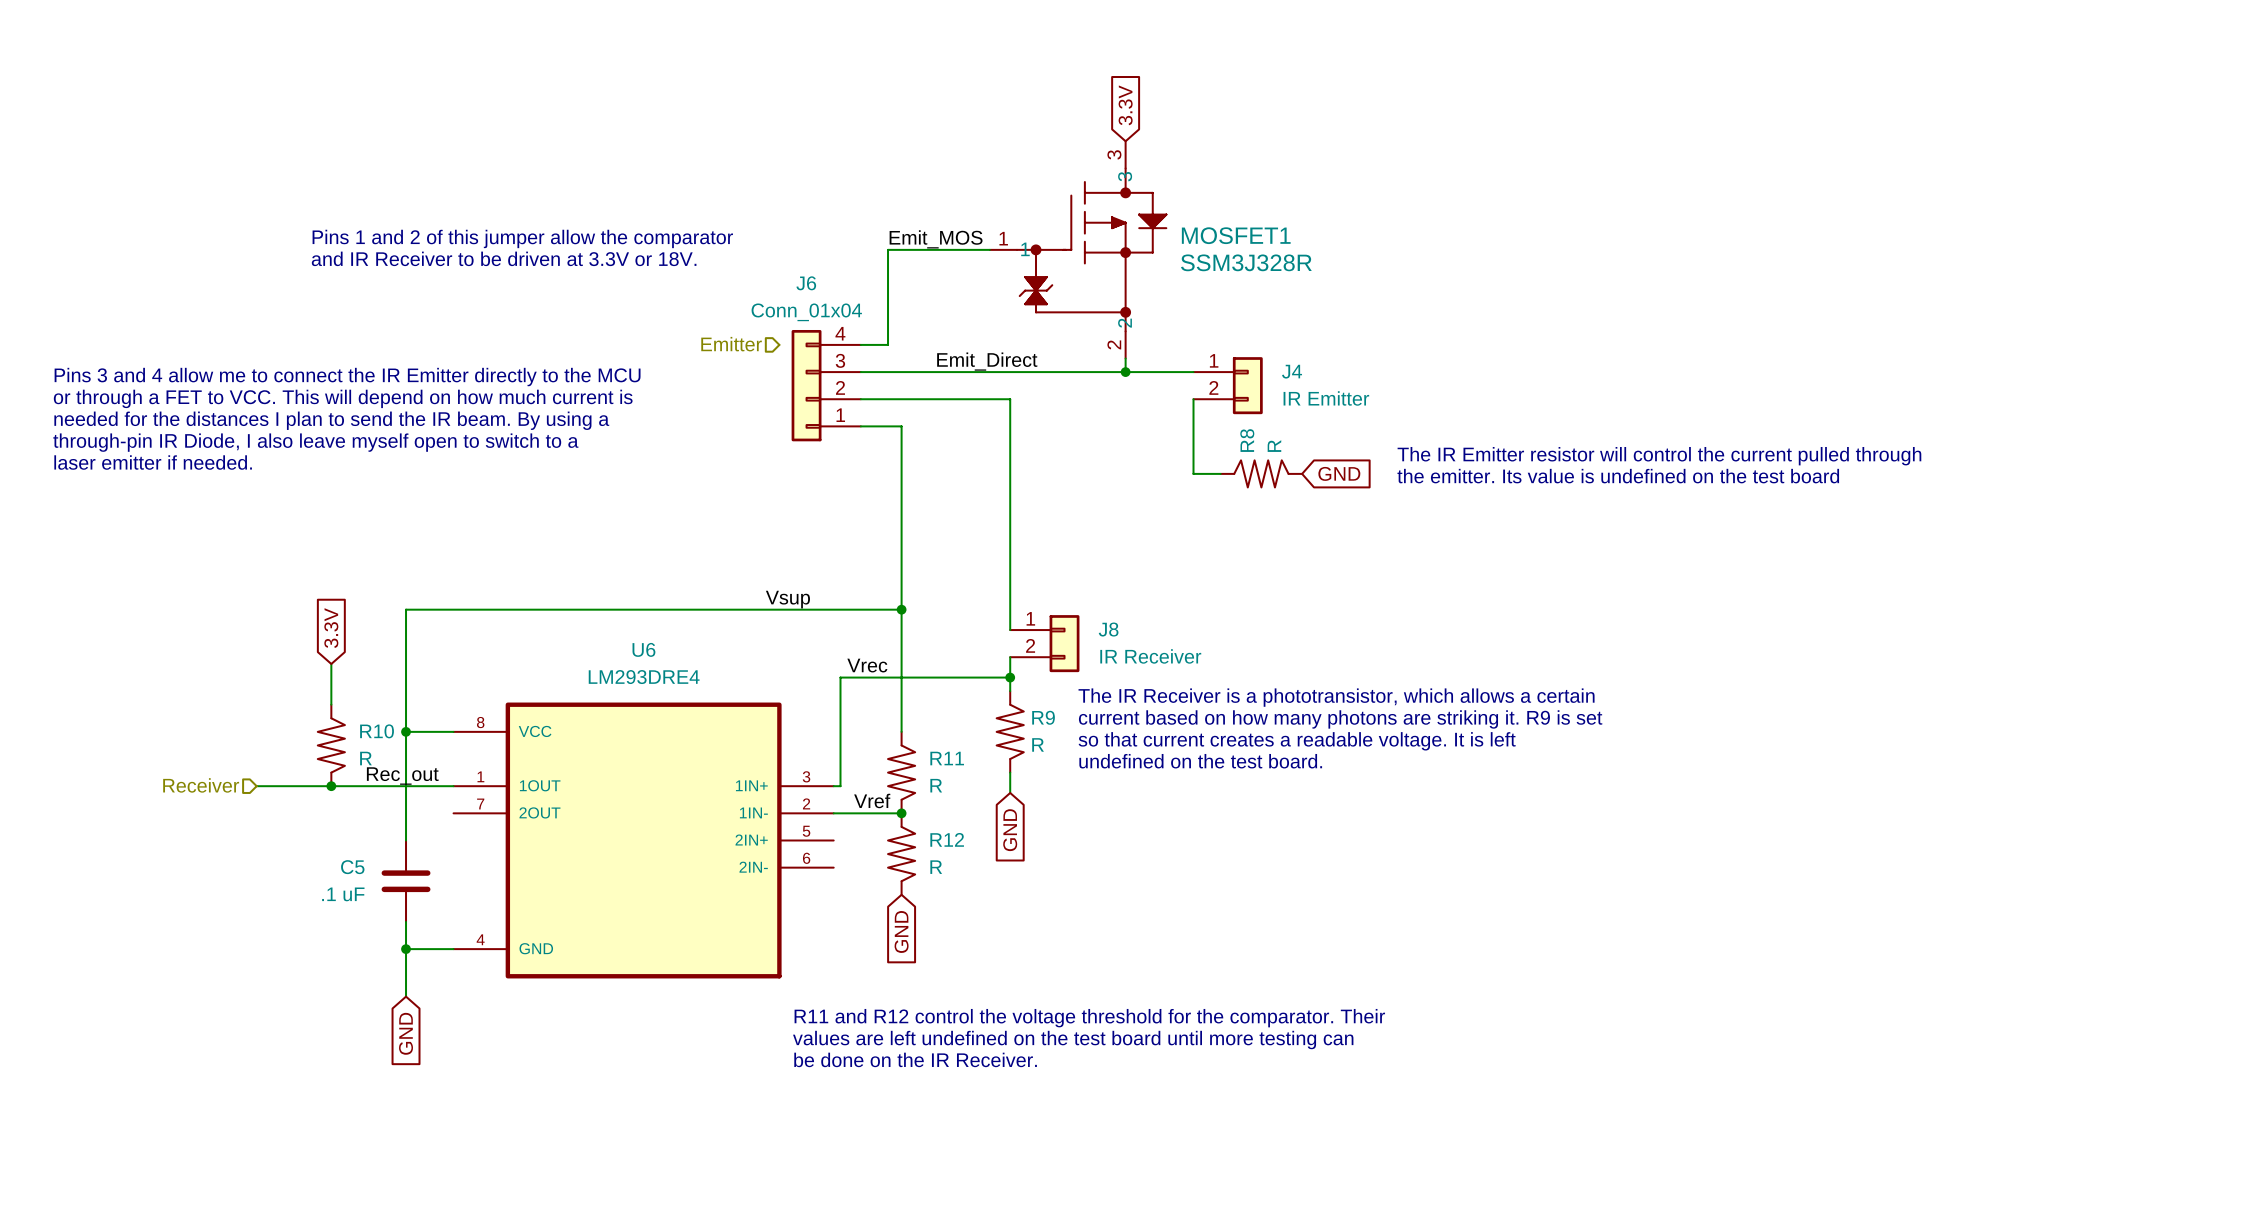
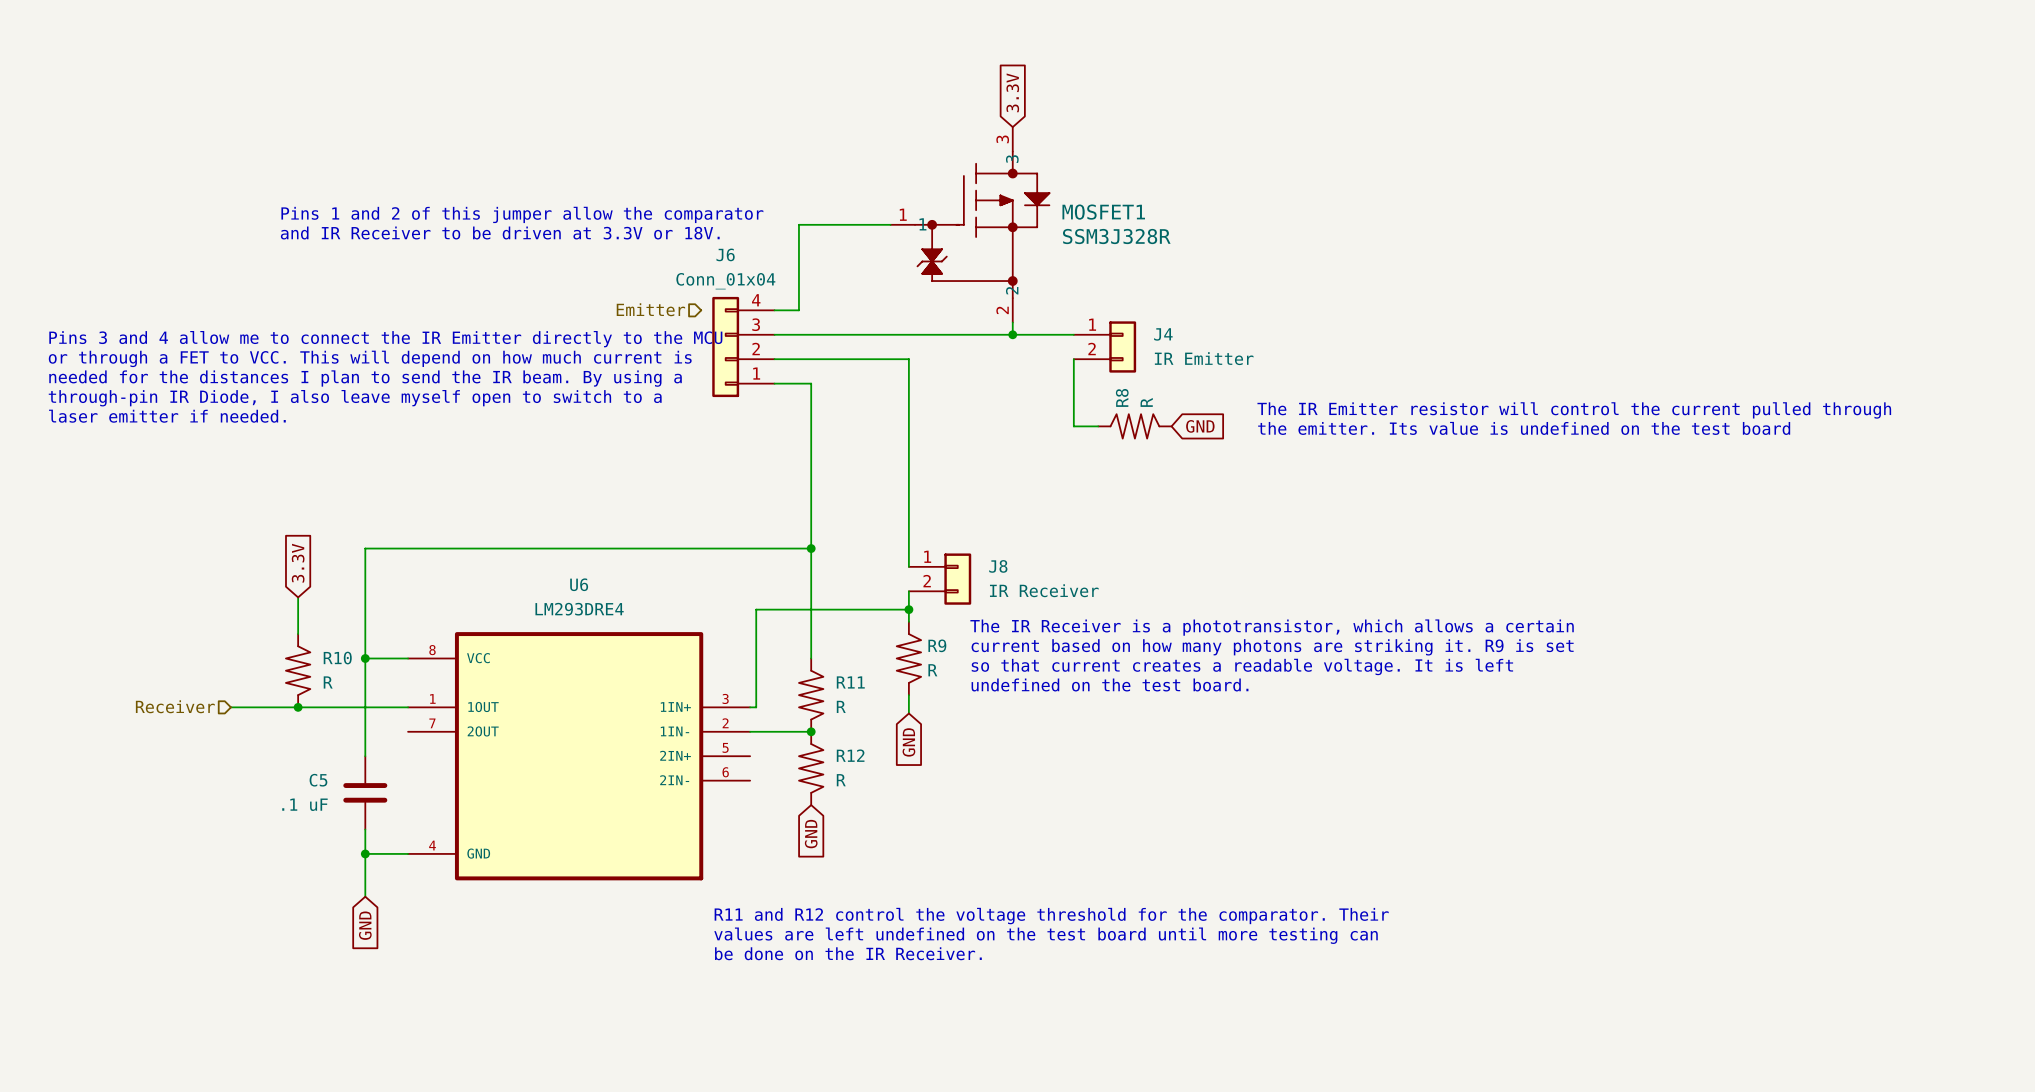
label: Emit_MOS (936, 239) -> none
label: Emit_Direct (987, 361) -> none
label: Vsup (787, 599) -> none
label: Vrec (867, 665) -> none
label: Rec_out (402, 776) -> none
label: Vref (872, 800) -> none

